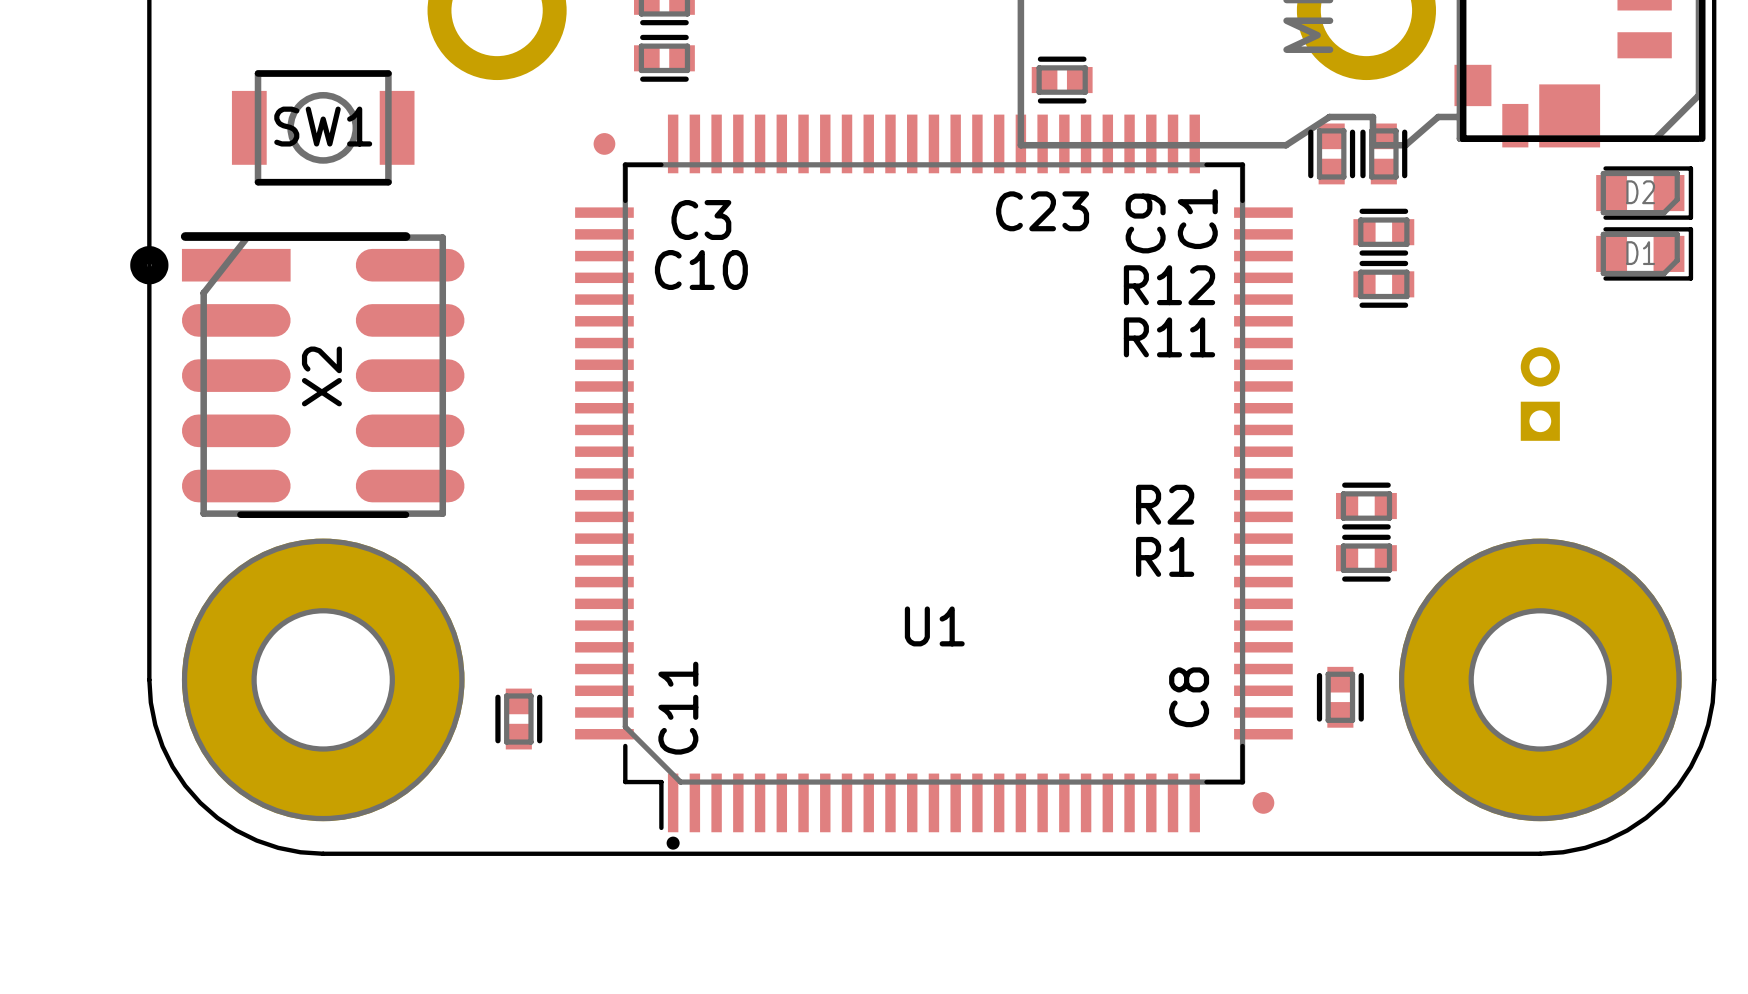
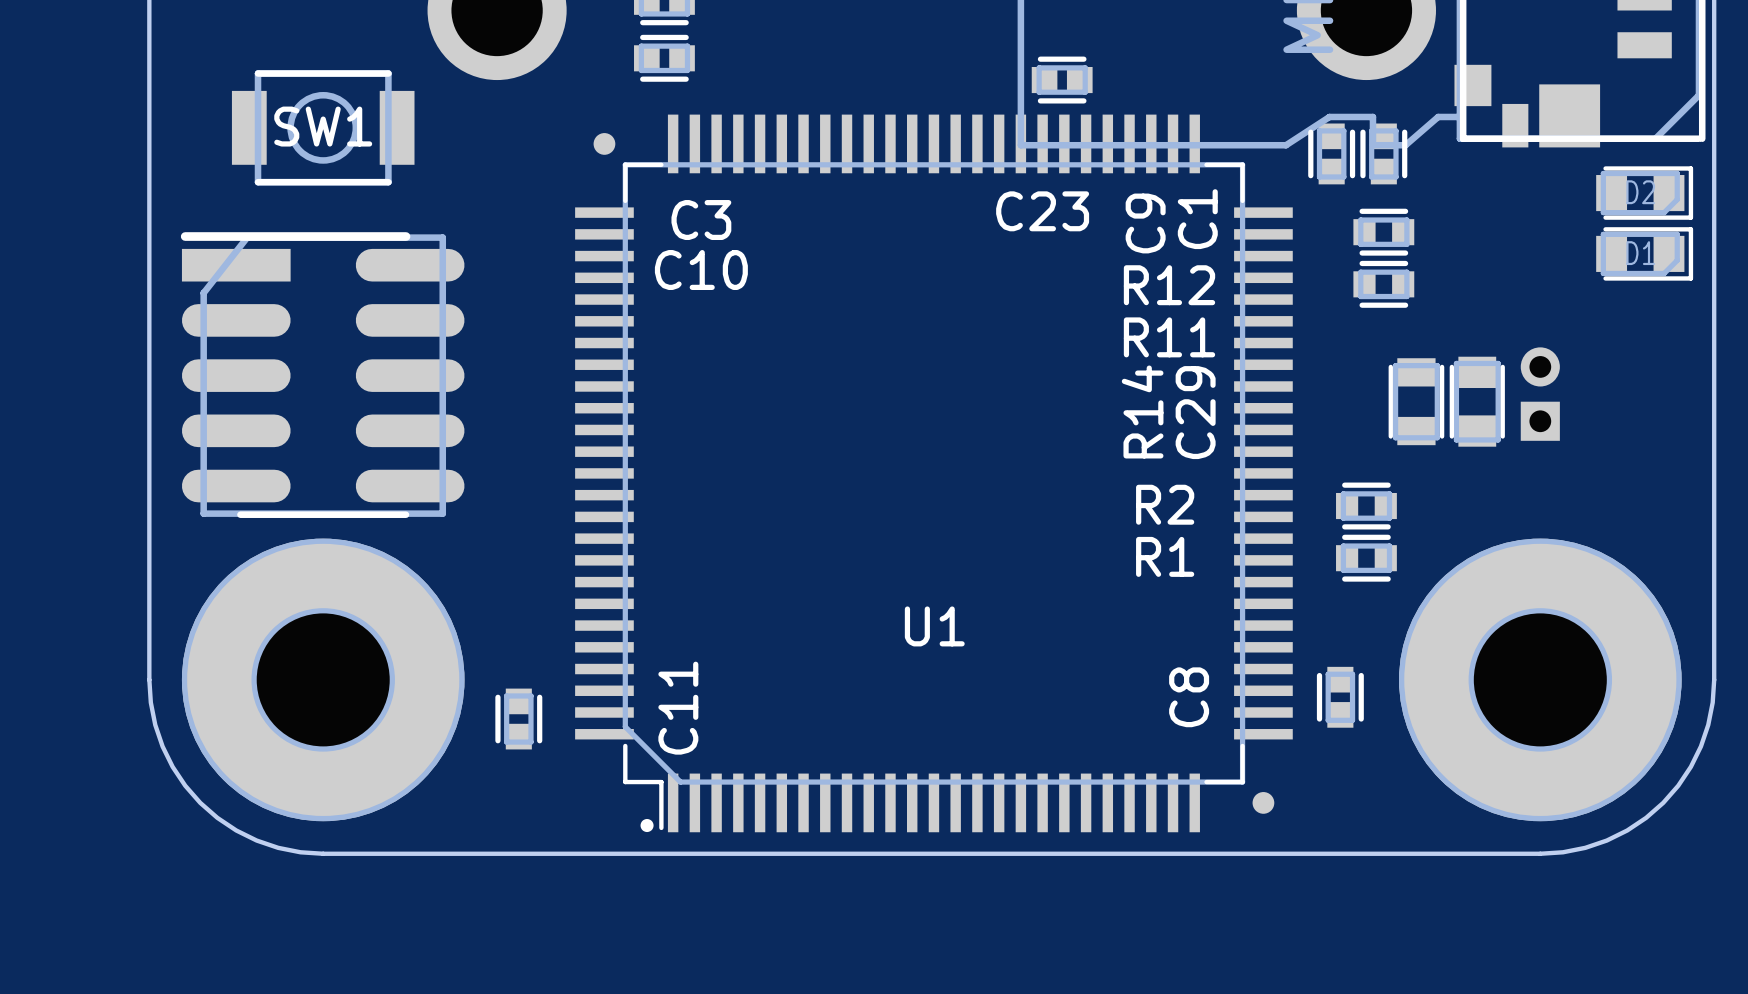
U1 footprint: [575, 114, 1293, 850] -> [575, 114, 1293, 833]
X2: (297, 375) -> none
R14: none -> (1416, 401)
C29: none -> (1477, 401)

